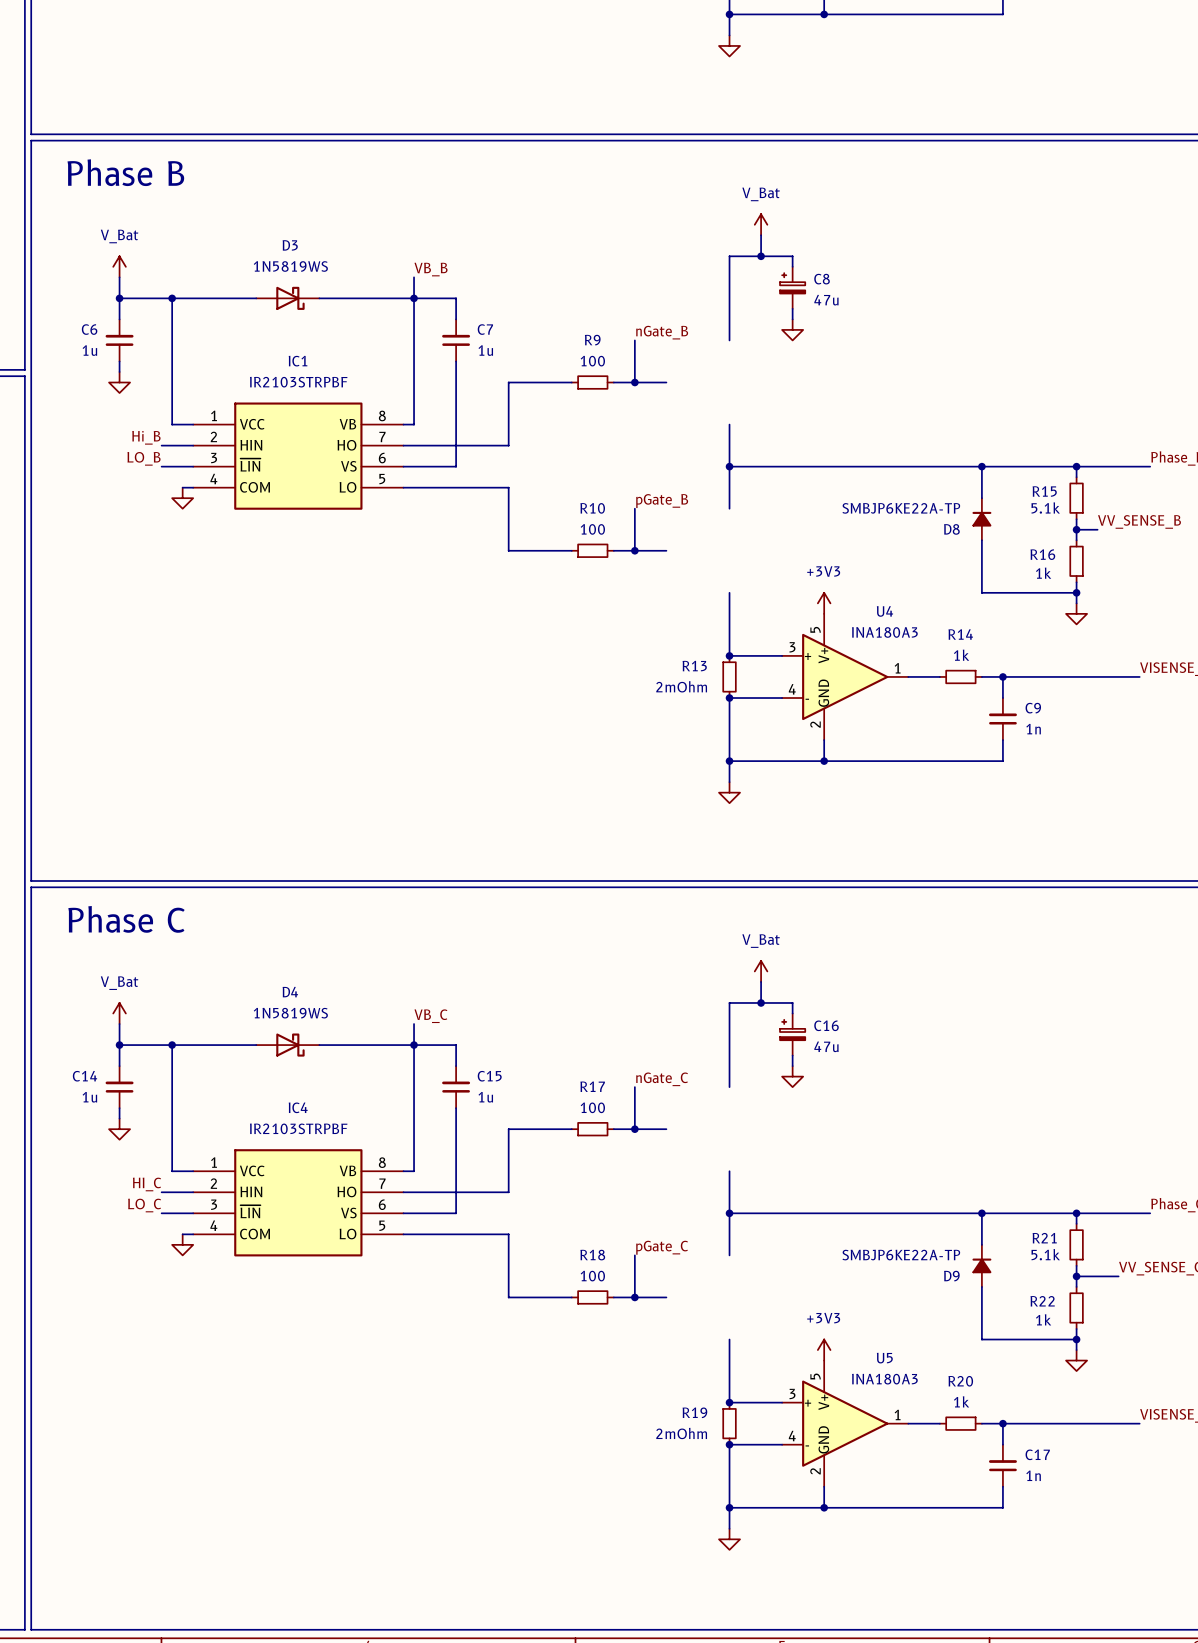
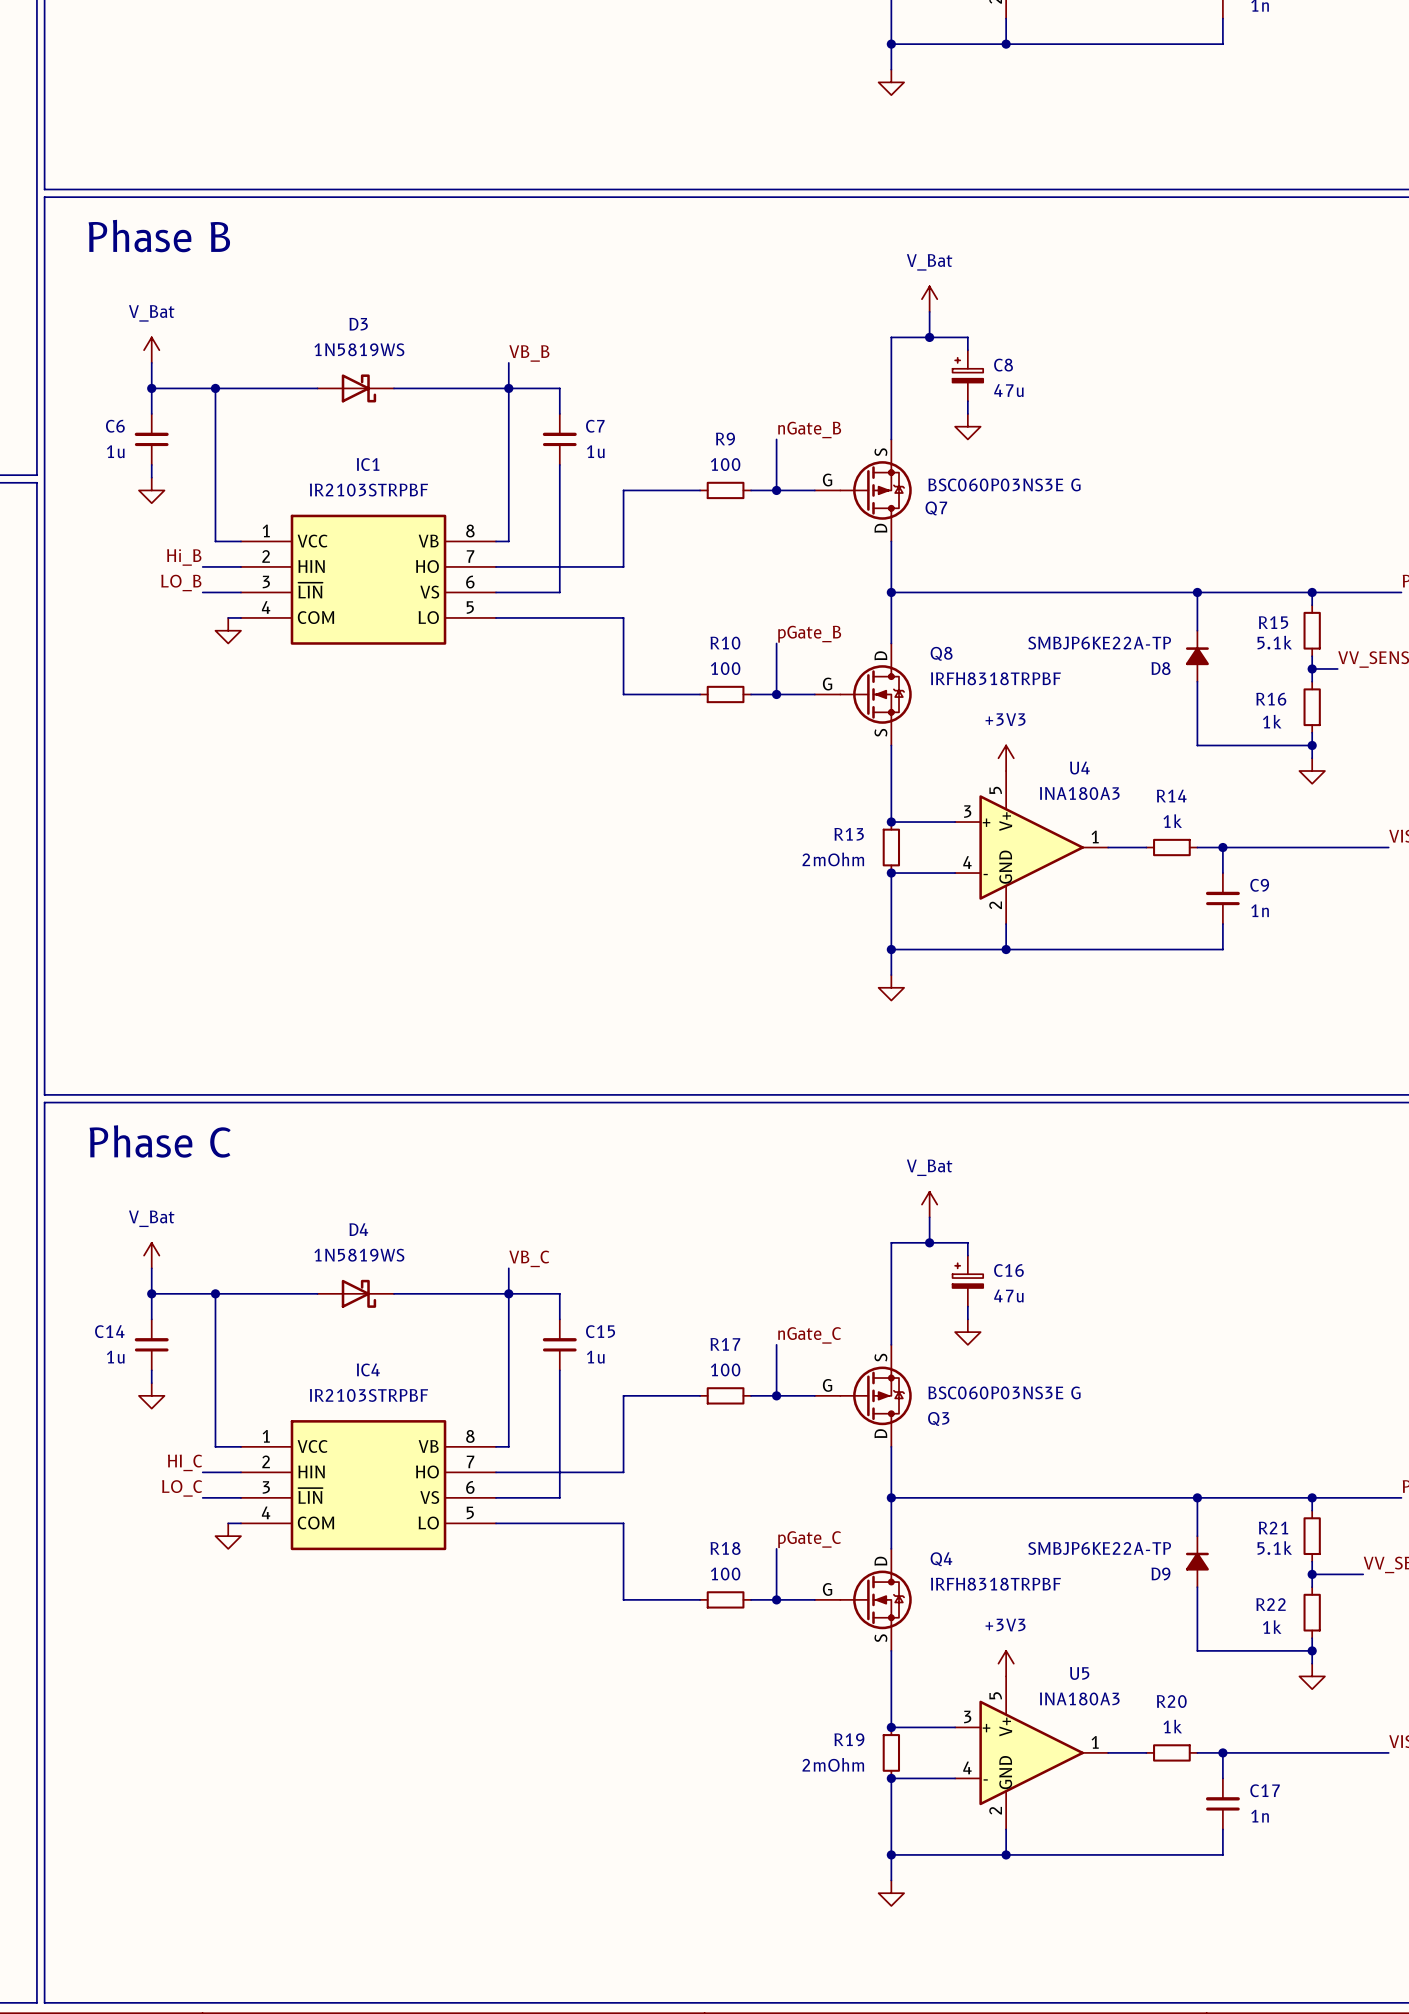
Q7: none -> BSC060P03NS3E G (863, 490)
Q8: none -> IRFH8318TRPBF (863, 694)
Q3: none -> BSC060P03NS3E G (863, 1395)
Q4: none -> IRFH8318TRPBF (863, 1599)

